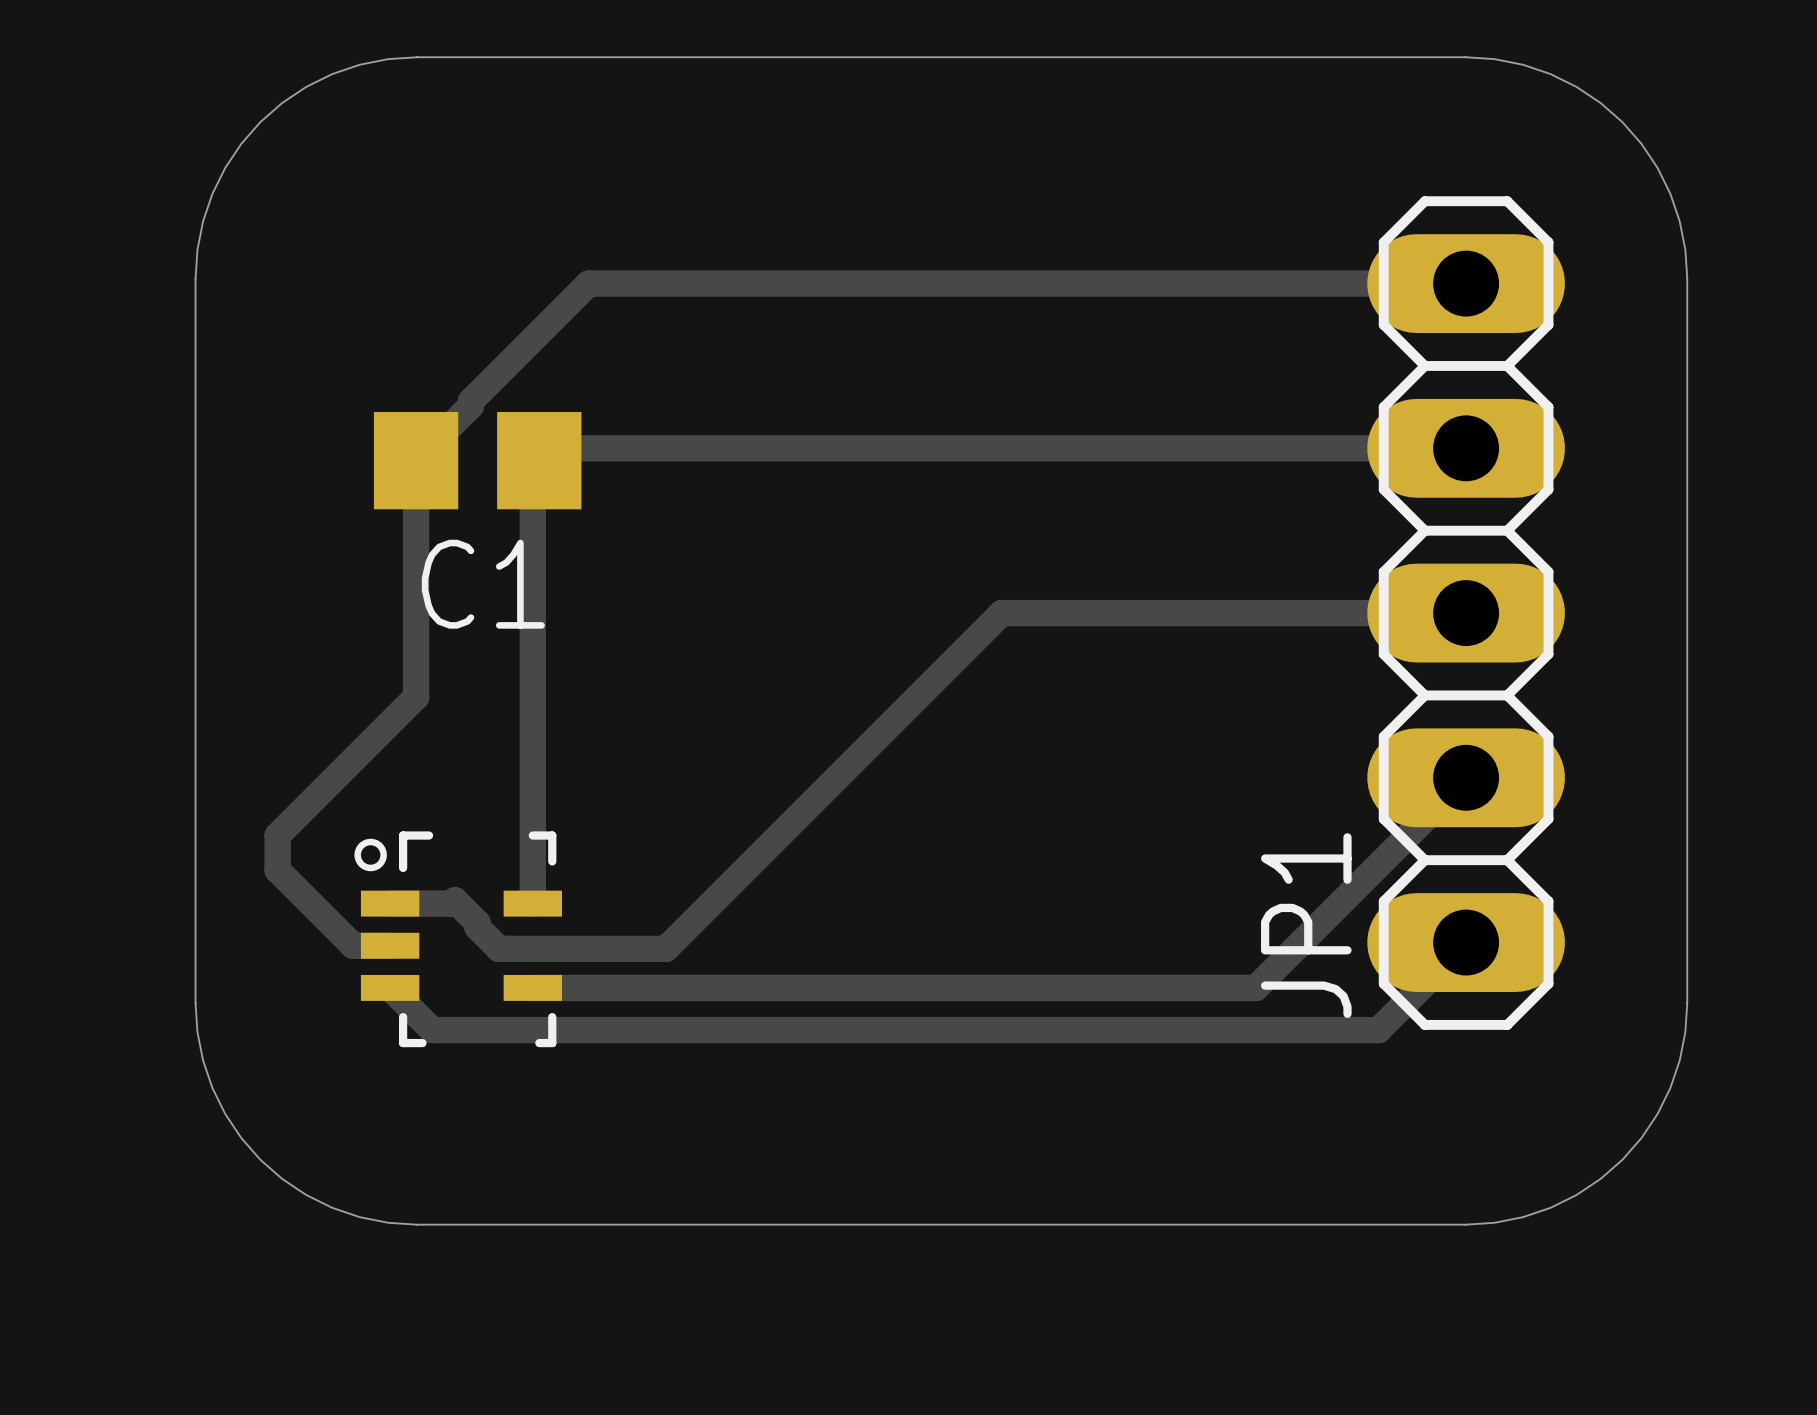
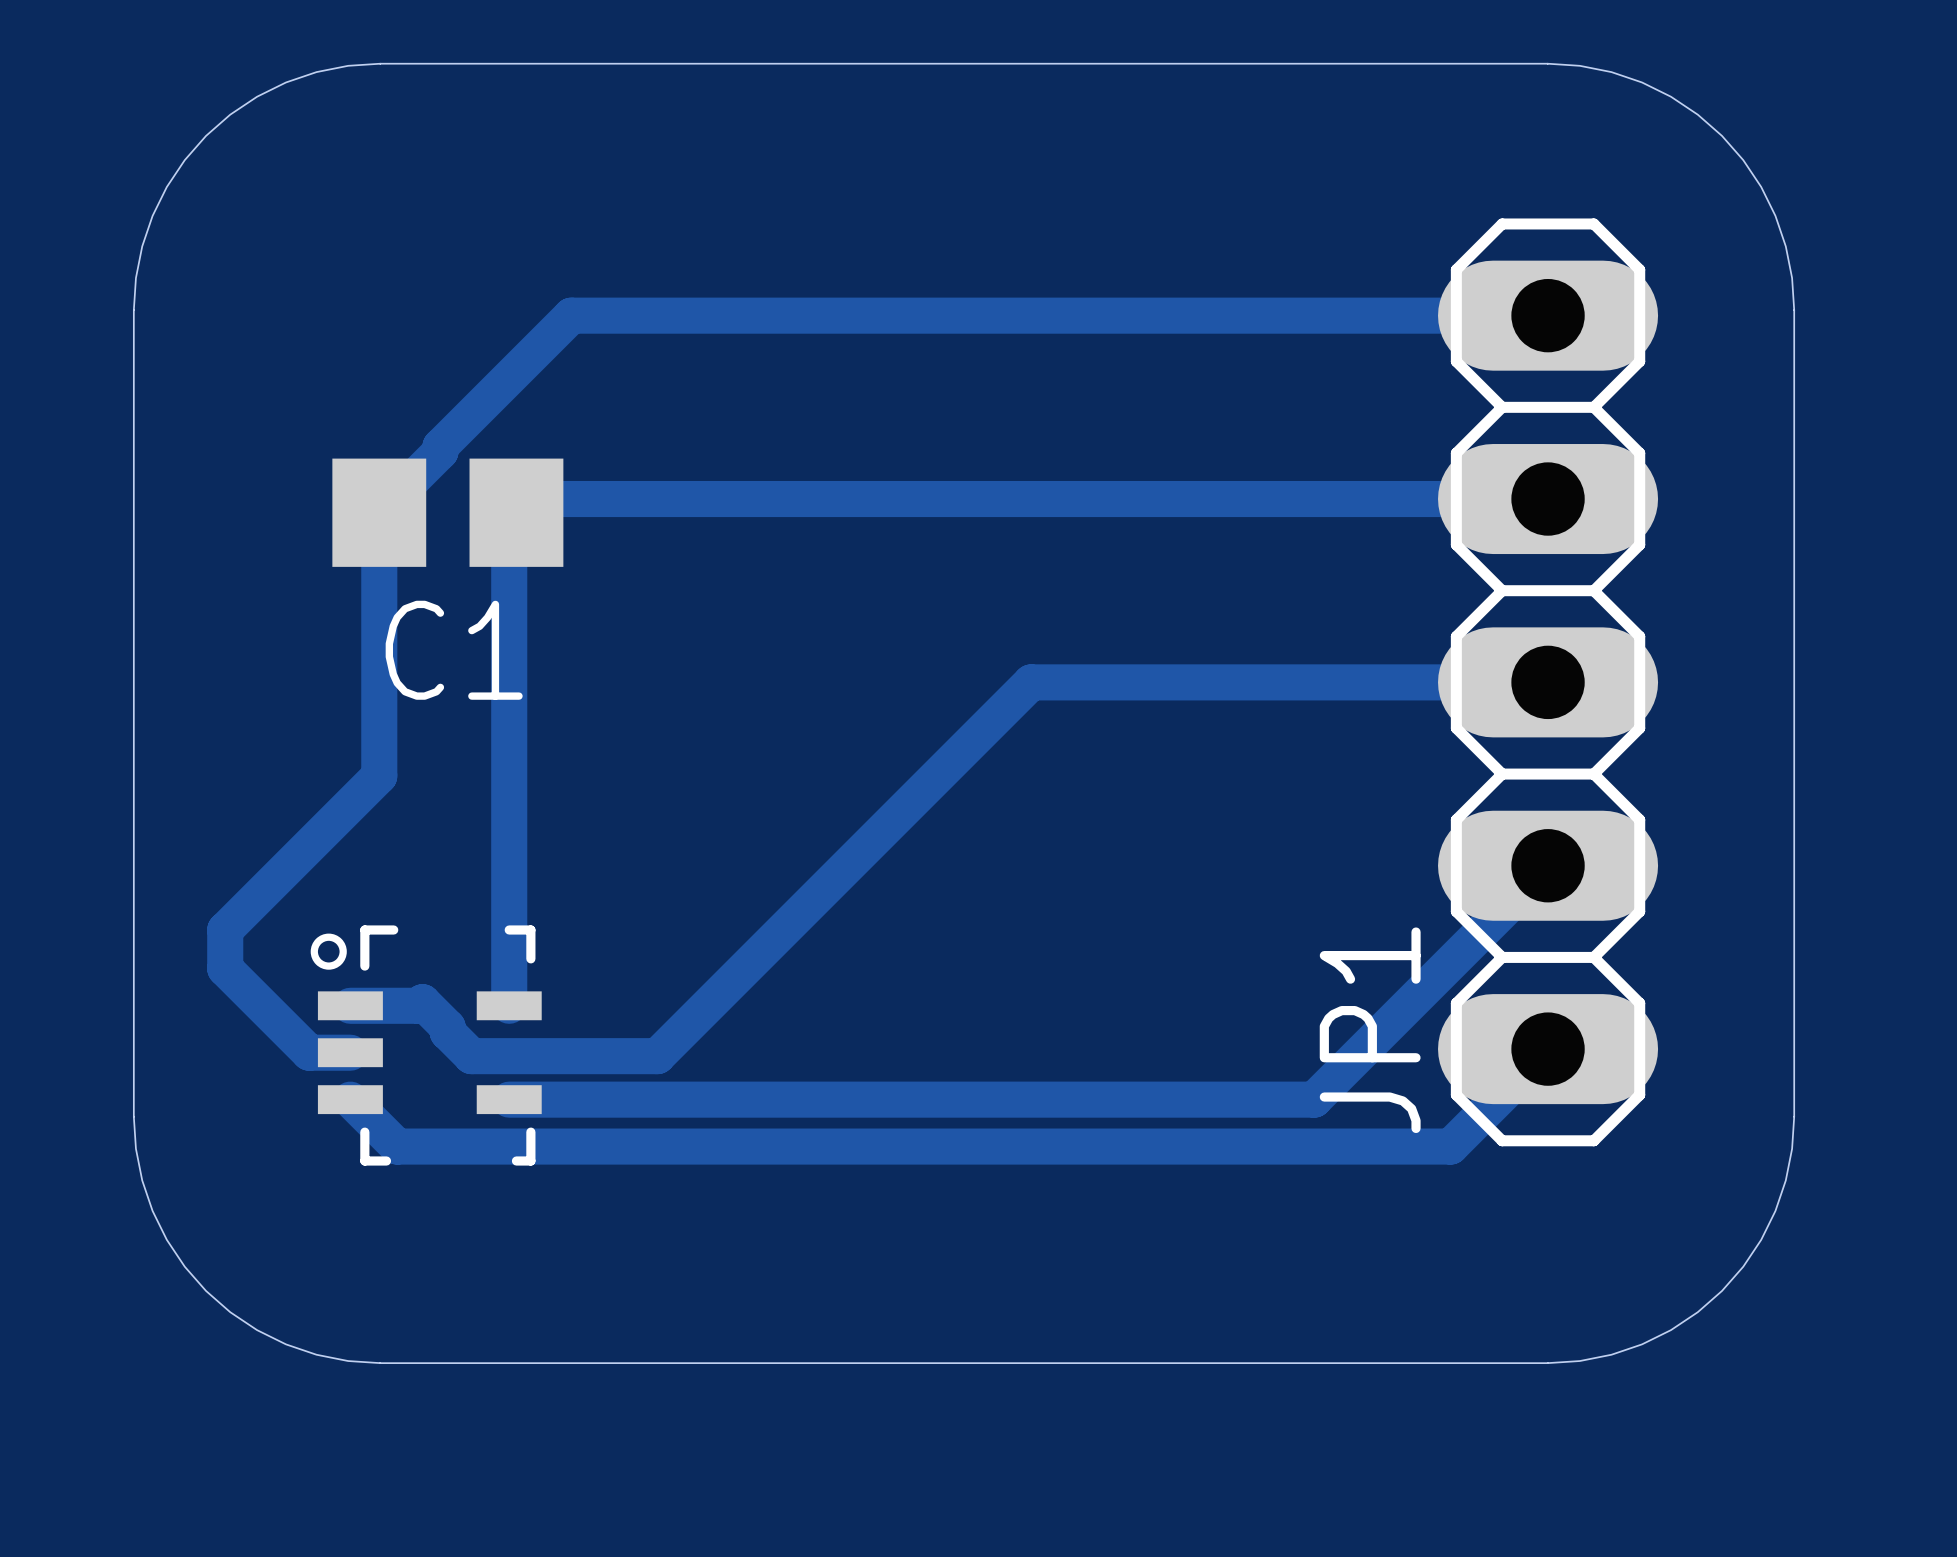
track width: thin (1466, 283) (588, 283) (471, 401) (471, 405) (416, 460) (416, 697) (277, 835) (277, 870) (353, 945) (390, 945) -> thick (1548, 315) (571, 315) (440, 446) (440, 451) (379, 512) (379, 775) (225, 929) (225, 968) (309, 1052) (350, 1052)
track width: thin (551, 448) (1466, 448) -> thick (530, 499) (1548, 499)
track width: thin (532, 467) (532, 903) -> thick (509, 519) (509, 1005)
track width: thin (1466, 613) (1001, 613) (665, 948) (498, 948) (477, 927) (477, 922) (454, 900) (451, 903) (390, 903) -> thick (1548, 682) (1031, 682) (657, 1056) (471, 1056) (447, 1032) (447, 1027) (422, 1002) (418, 1005) (350, 1005)
track width: thin (1466, 777) (1255, 987) (532, 987) -> thick (1548, 865) (1314, 1099) (509, 1099)
track width: thin (1466, 942) (1378, 1030) (432, 1030) (390, 987) -> thick (1548, 1049) (1450, 1146) (397, 1146) (350, 1099)

